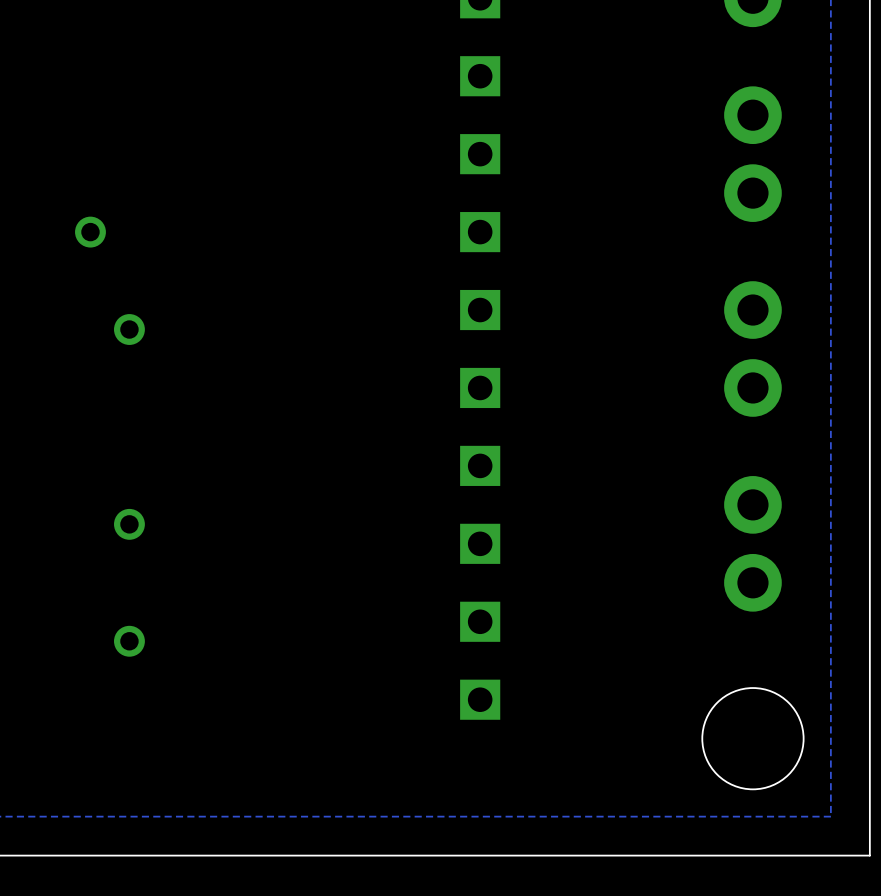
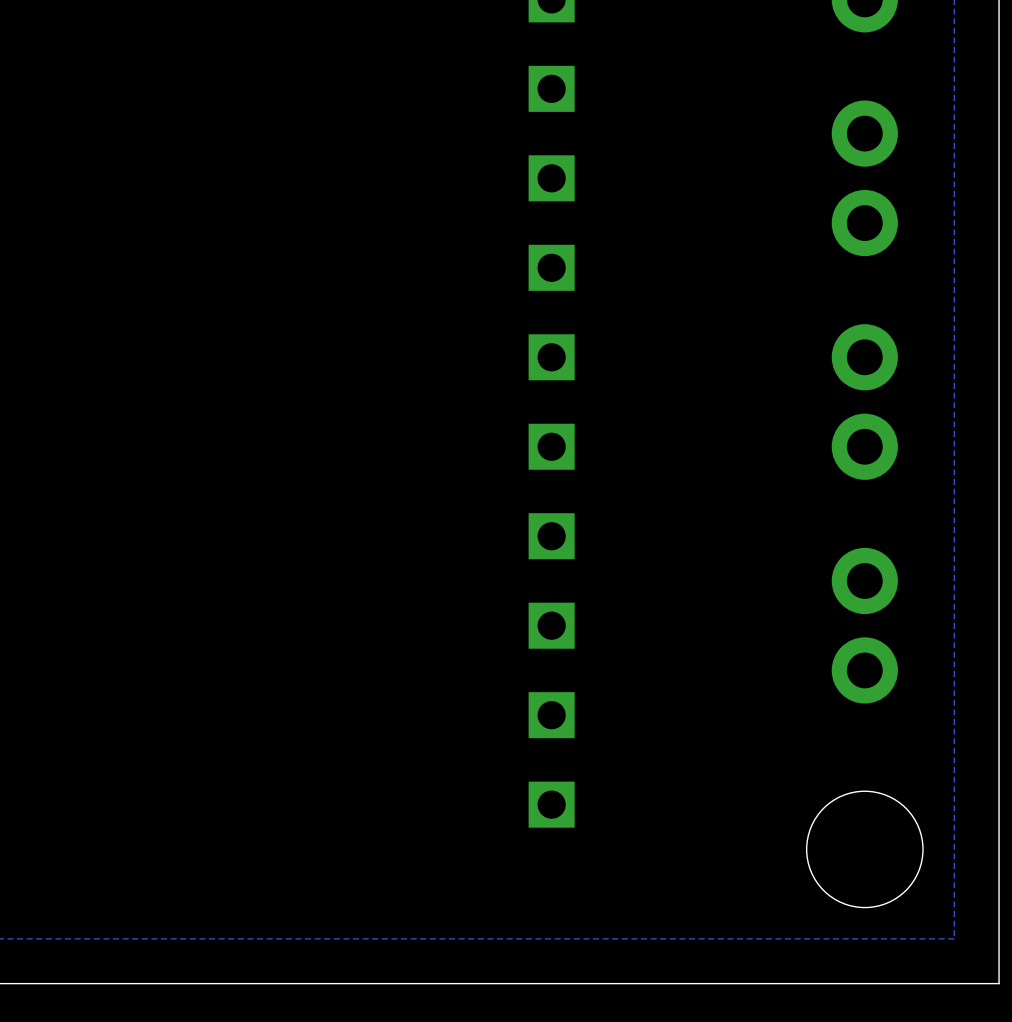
via: (90, 232) -> none
via: (129, 329) -> none
via: (129, 524) -> none
via: (129, 641) -> none

